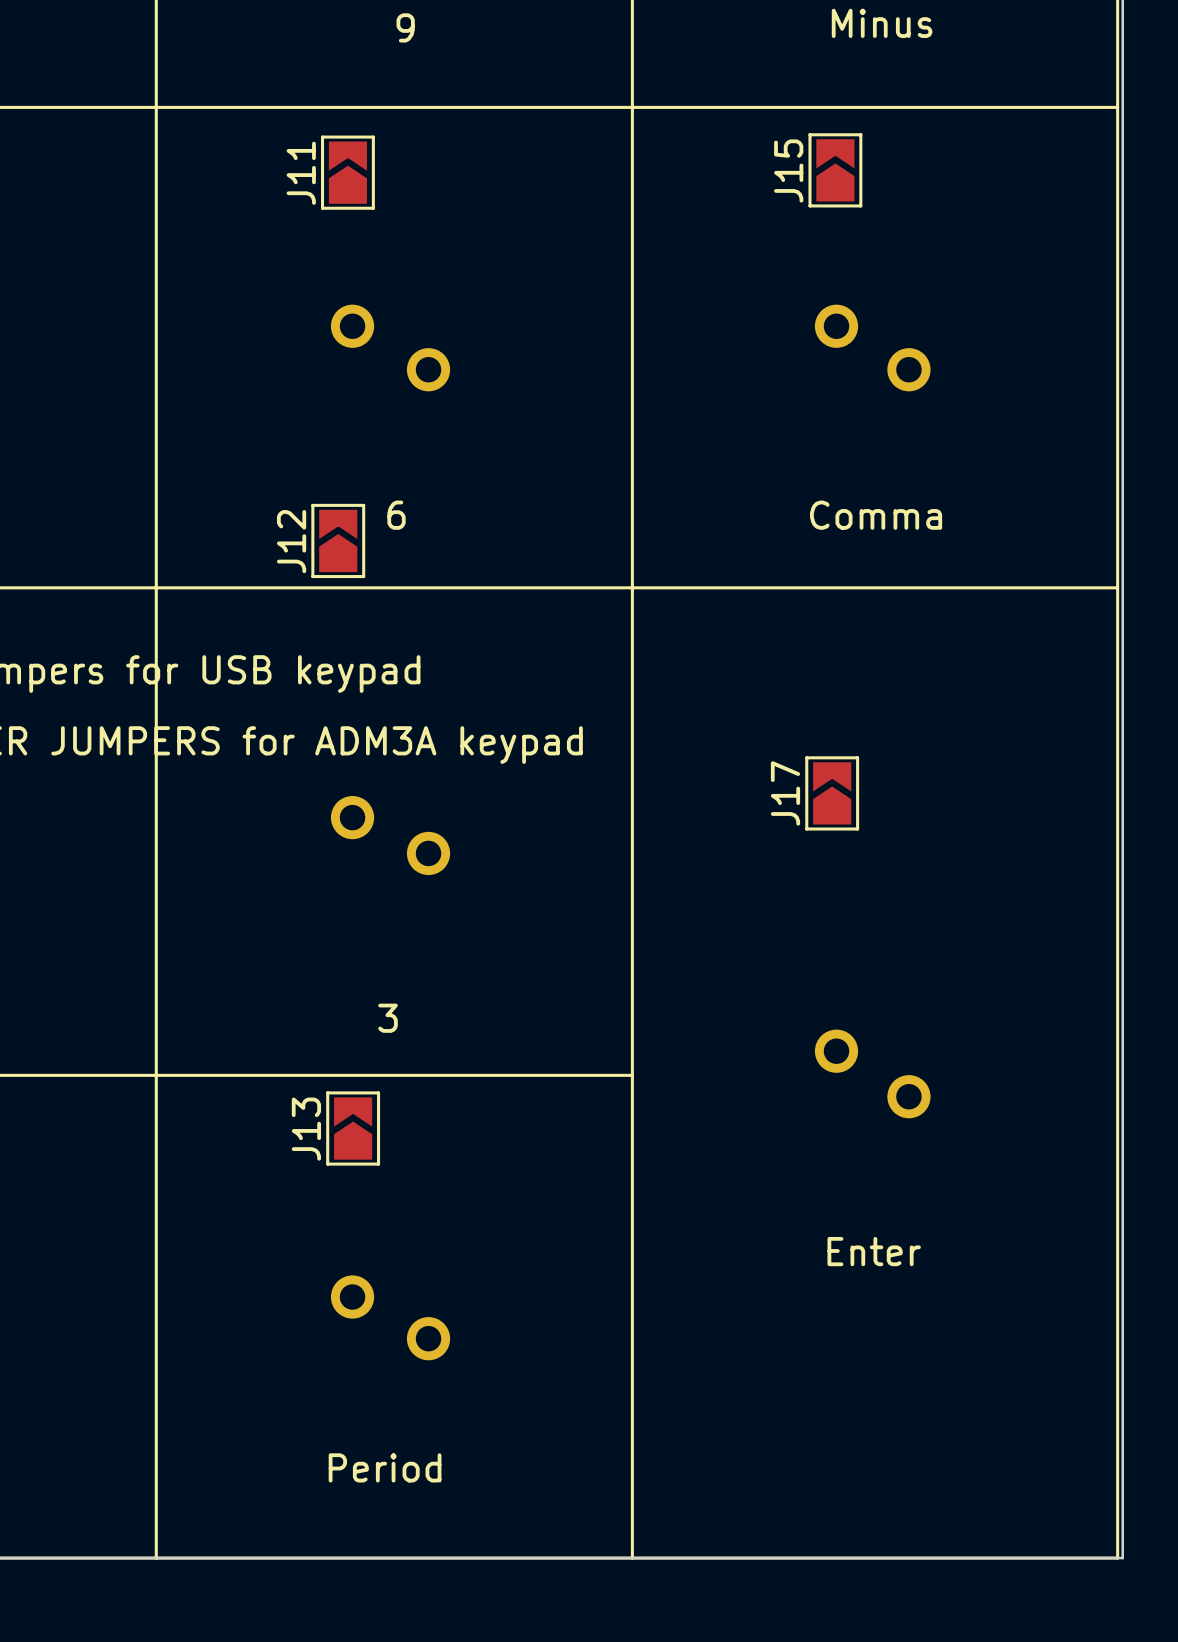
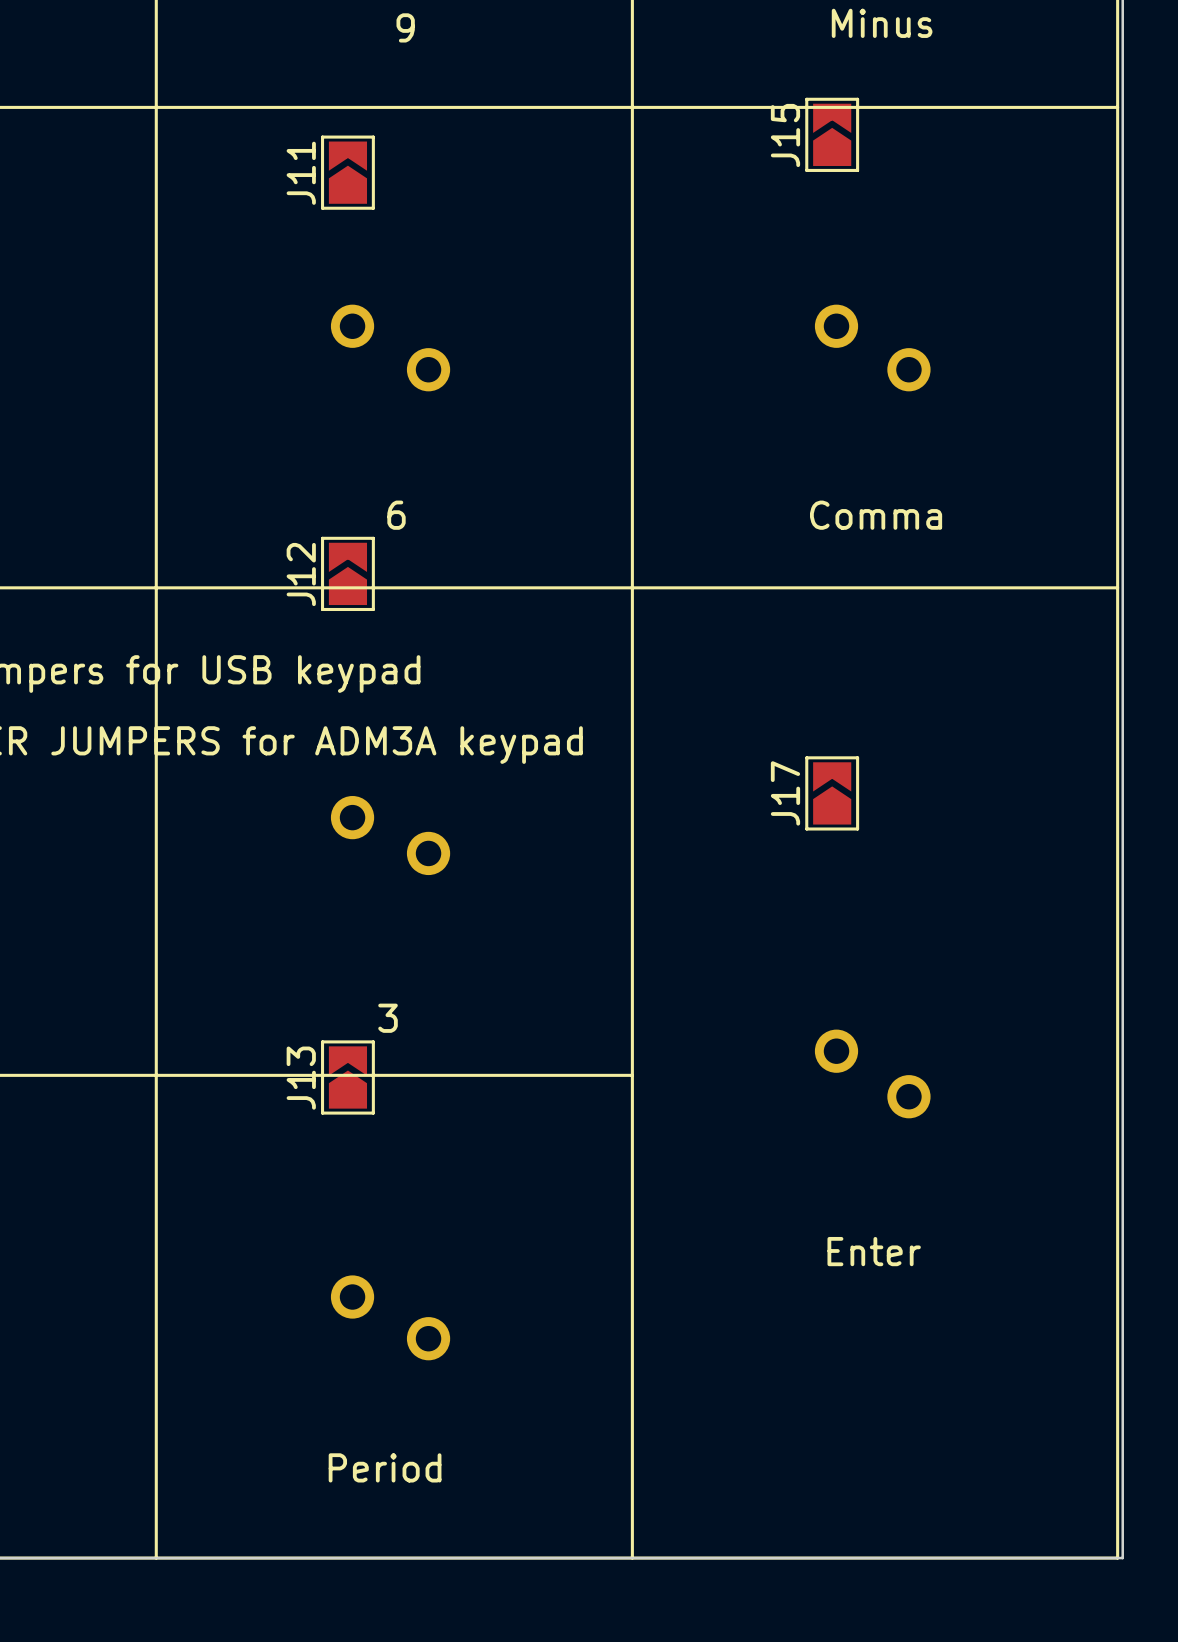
J15 position: (835, 170) -> (832, 134)
J12 position: (338, 540) -> (347, 573)
J13 position: (353, 1128) -> (347, 1077)

